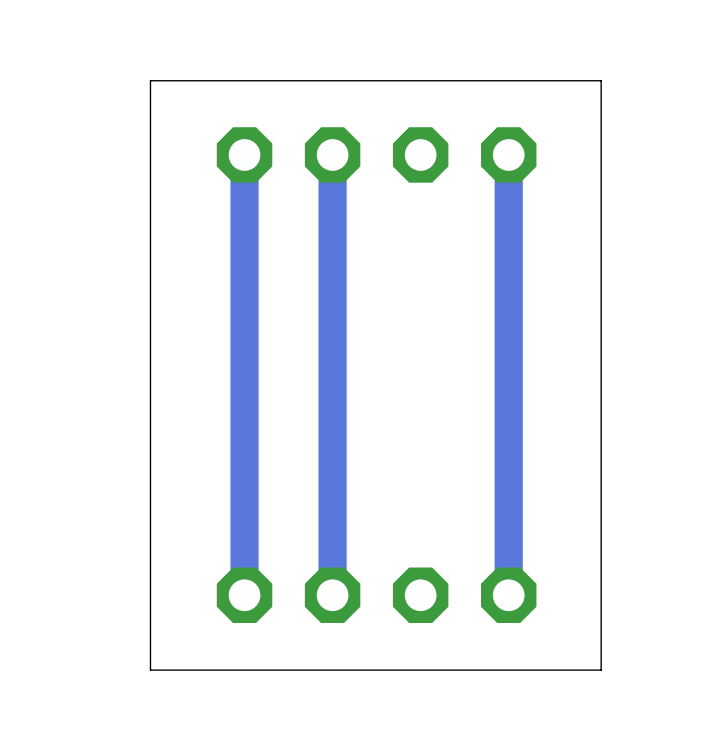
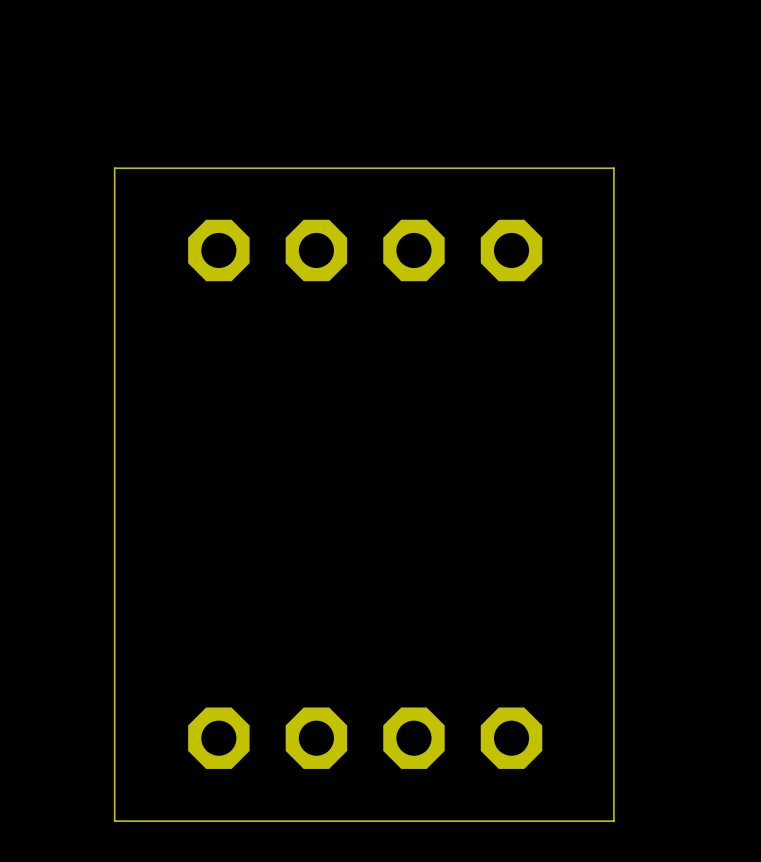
track: (244, 154) (244, 595) -> none
track: (332, 154) (332, 595) -> none
track: (508, 154) (508, 595) -> none

